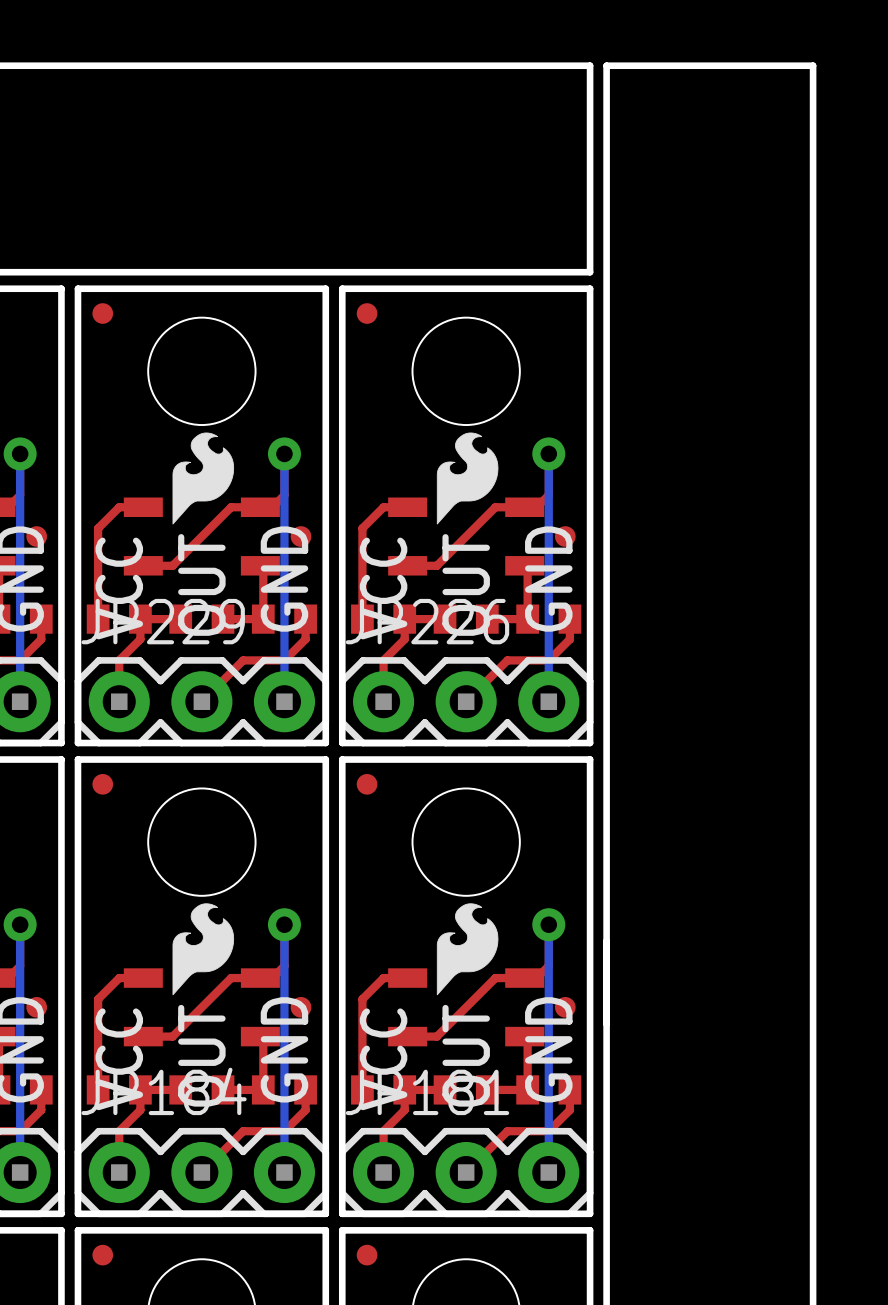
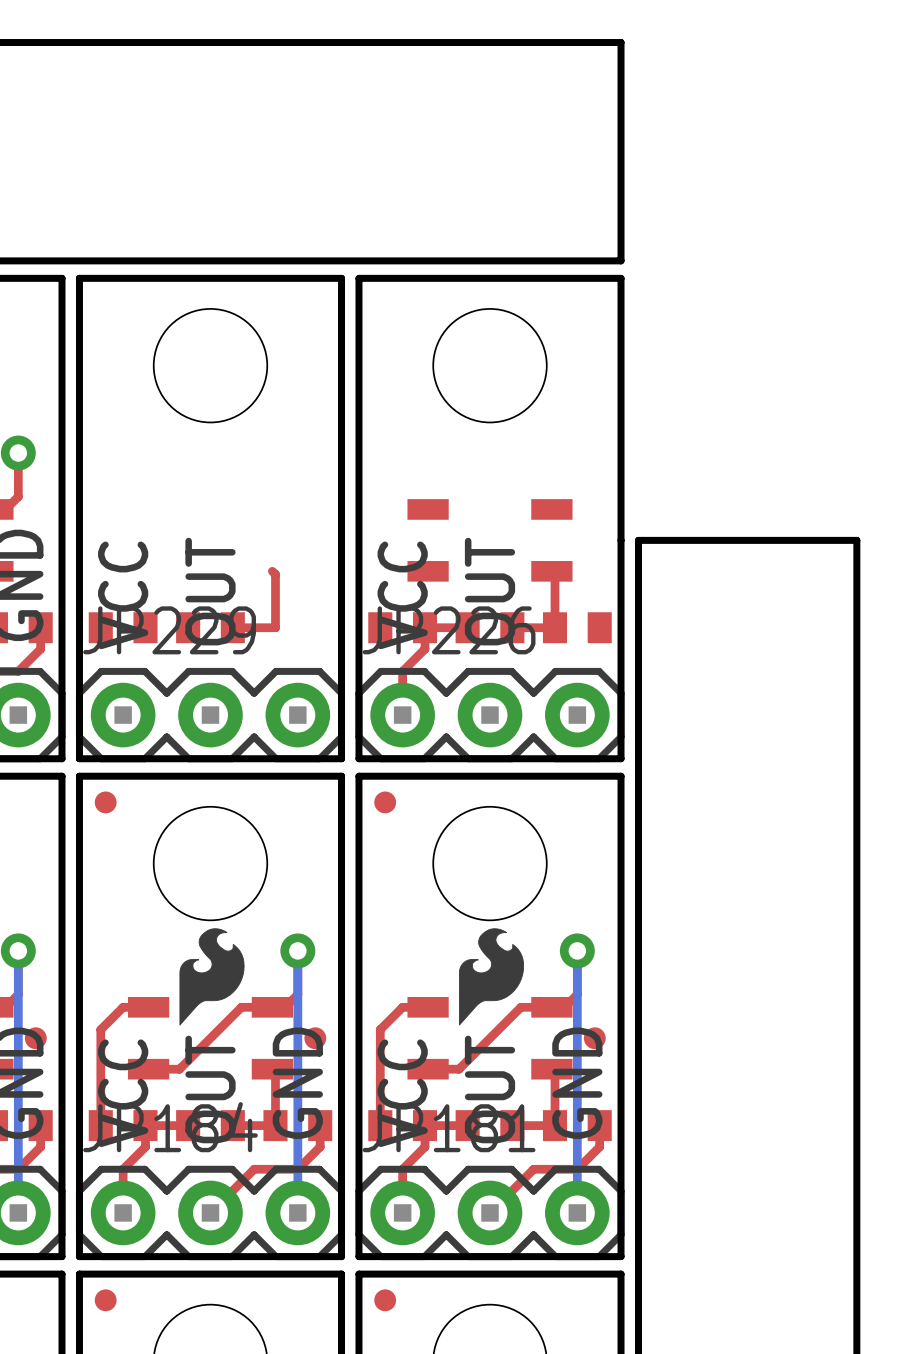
part: (102, 313) -> none
part: (367, 313) -> none
drawing: [172, 432, 235, 525] -> none
drawing: [436, 432, 499, 525] -> none
bottom track: (20, 453) (20, 701) -> none
top track: (284, 453) (284, 495) (272, 507) (231, 507) (172, 565) (143, 565) -> none
bottom track: (284, 453) (284, 701) -> none
via: (284, 453) -> none
top track: (548, 453) (548, 495) (536, 507) (495, 507) (436, 565) (407, 565) -> none
bottom track: (548, 453) (548, 701) -> none
via: (548, 453) -> none
top track: (143, 507) (119, 507) (98, 528) (98, 619) -> none
top track: (407, 507) (383, 507) (362, 528) (362, 619) -> none
part: (36, 536) -> none
part: (201, 536) -> none
part: (300, 536) -> none
part: (565, 536) -> none
board edge: (813, 536) (813, 65) (606, 65) (606, 536) -> (856, 540) (638, 540)
text: GND (284, 579) -> none
text: GND (548, 579) -> none
top track: (180, 619) (140, 619) (140, 639) (119, 660) (119, 701) -> none
part: (284, 619) -> none
top track: (305, 619) (305, 639) (284, 660) (243, 660) (201, 701) -> none
top track: (569, 619) (569, 639) (548, 660) (507, 660) (466, 701) -> none

